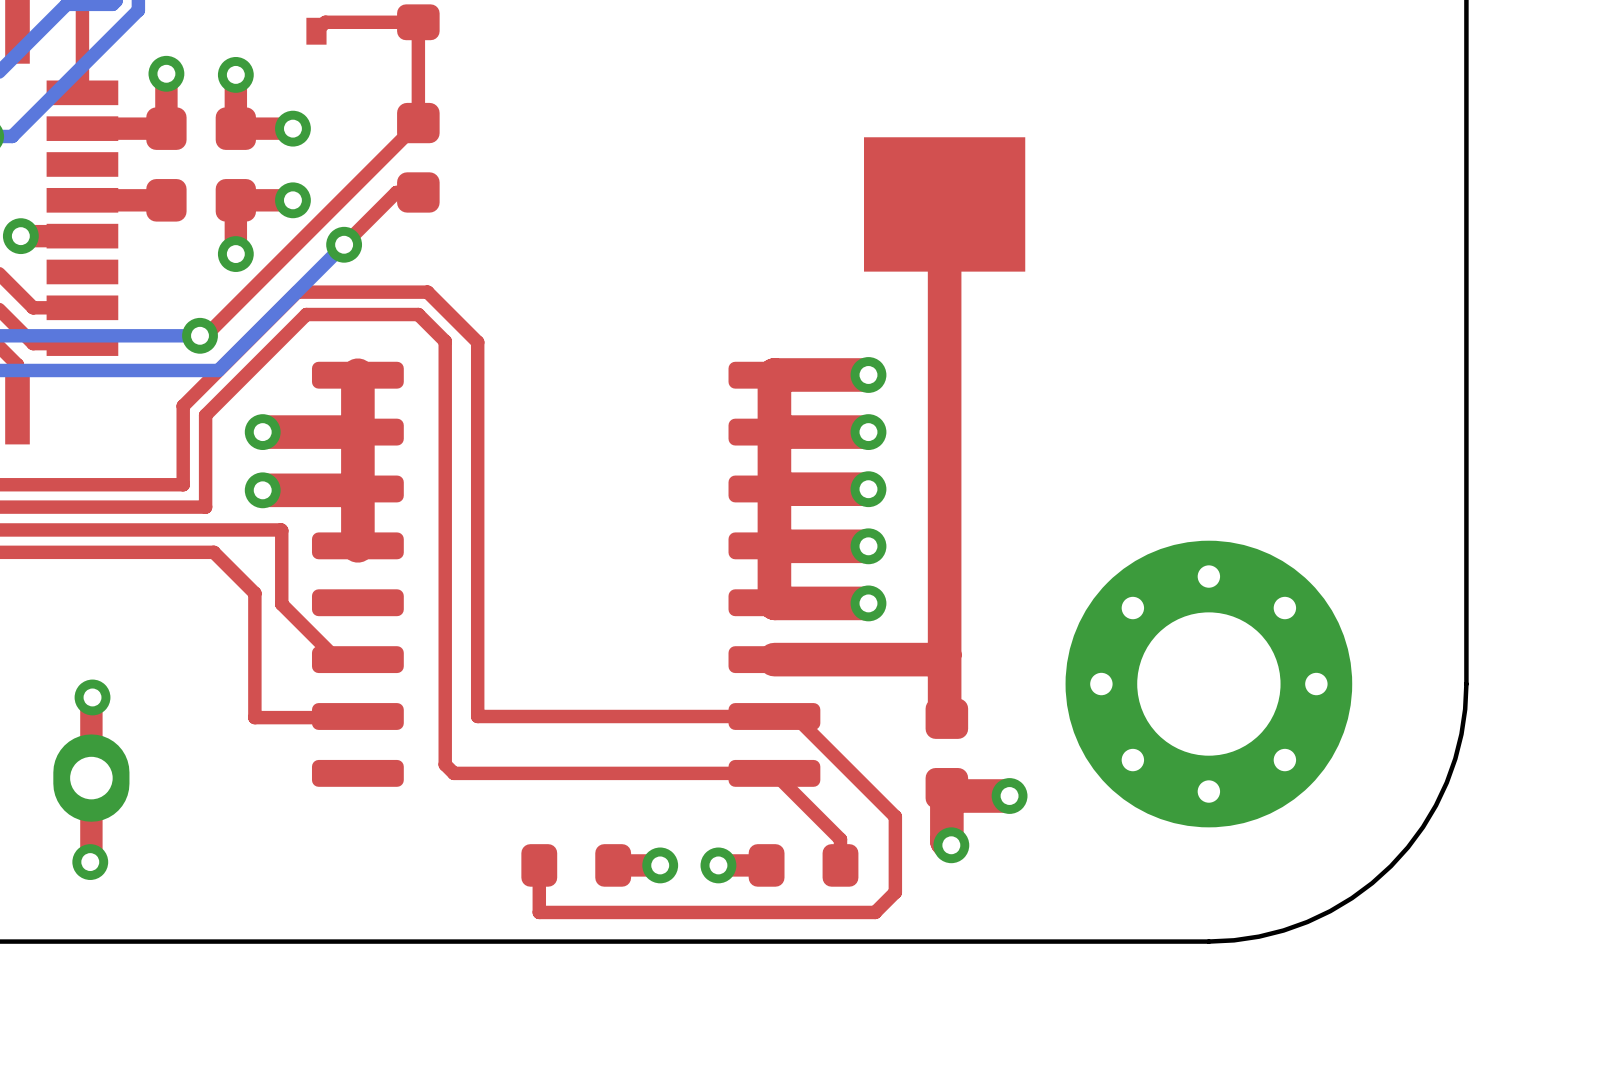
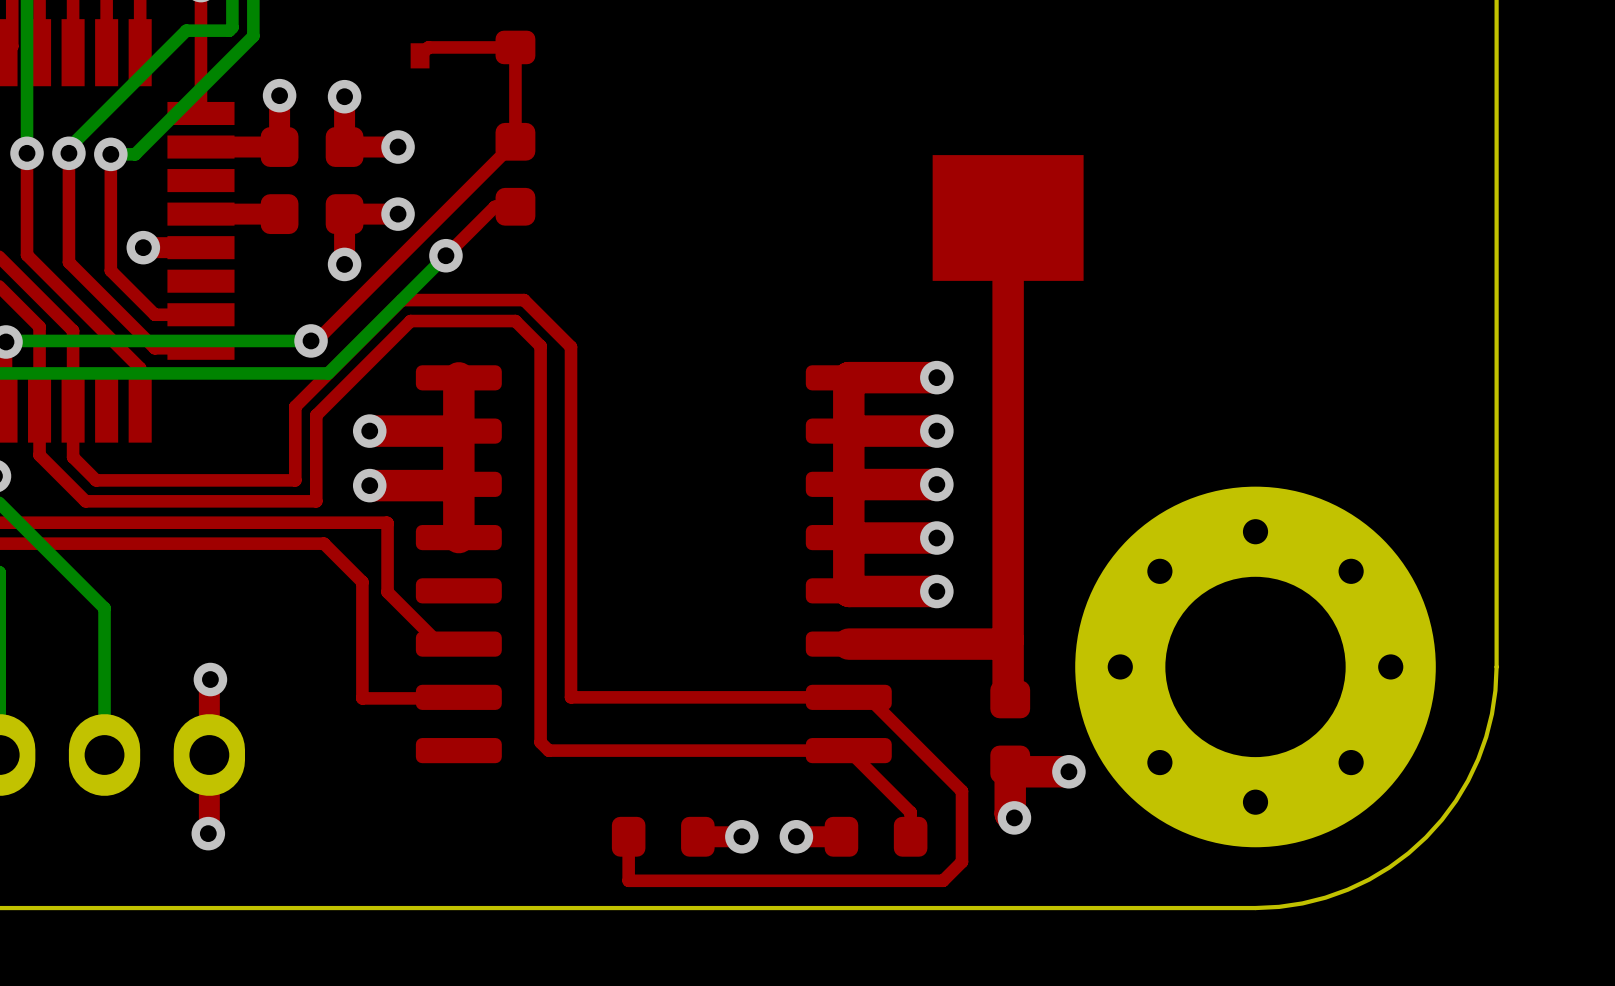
part footprint: [1065, 540, 1353, 828] -> [1075, 486, 1436, 848]

